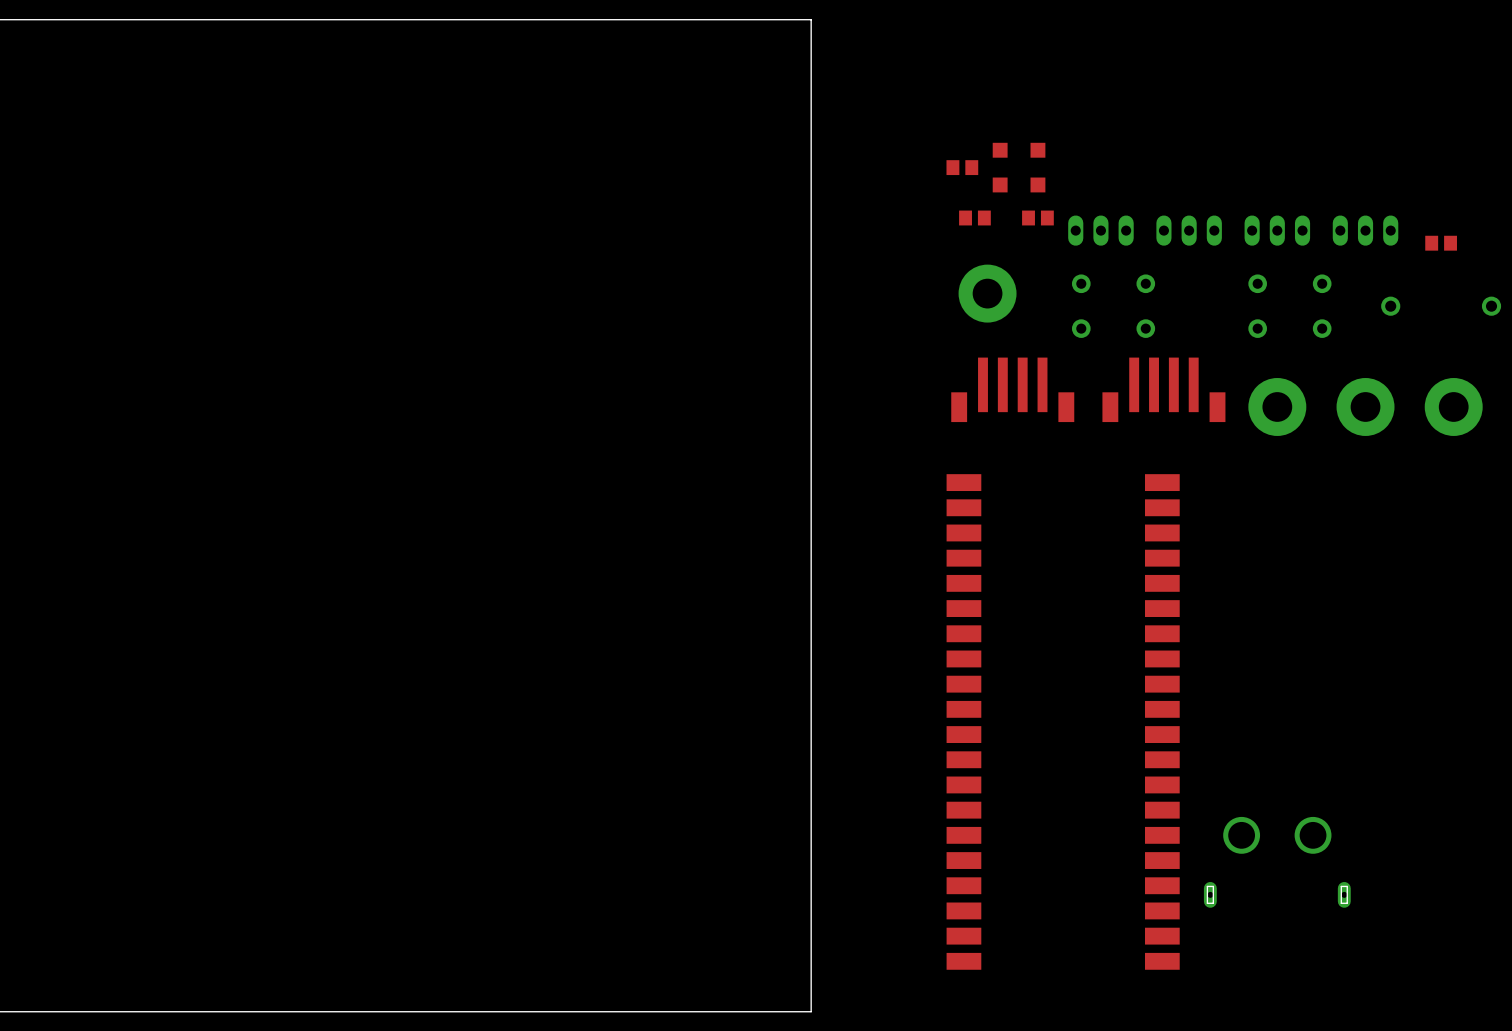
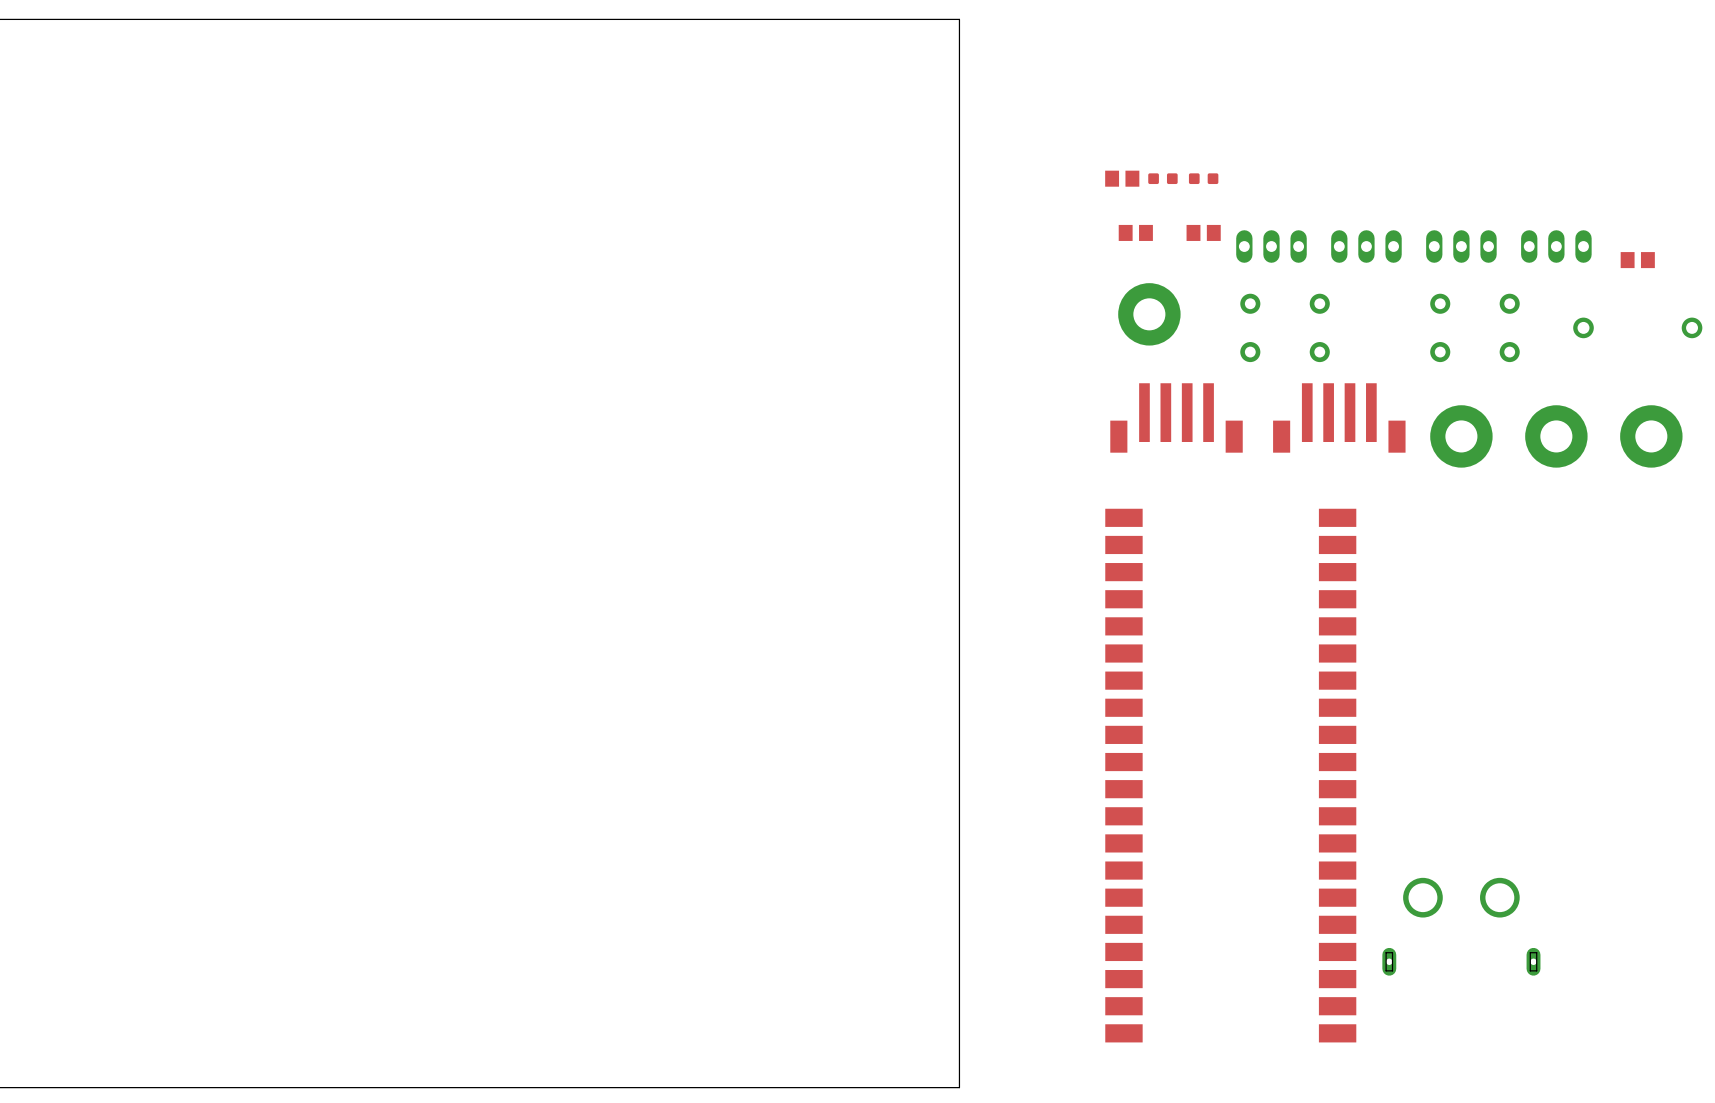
part footprint: [992, 142, 1008, 193] -> [1148, 173, 1178, 185]
part footprint: [1030, 142, 1046, 193] -> [1188, 173, 1219, 185]

